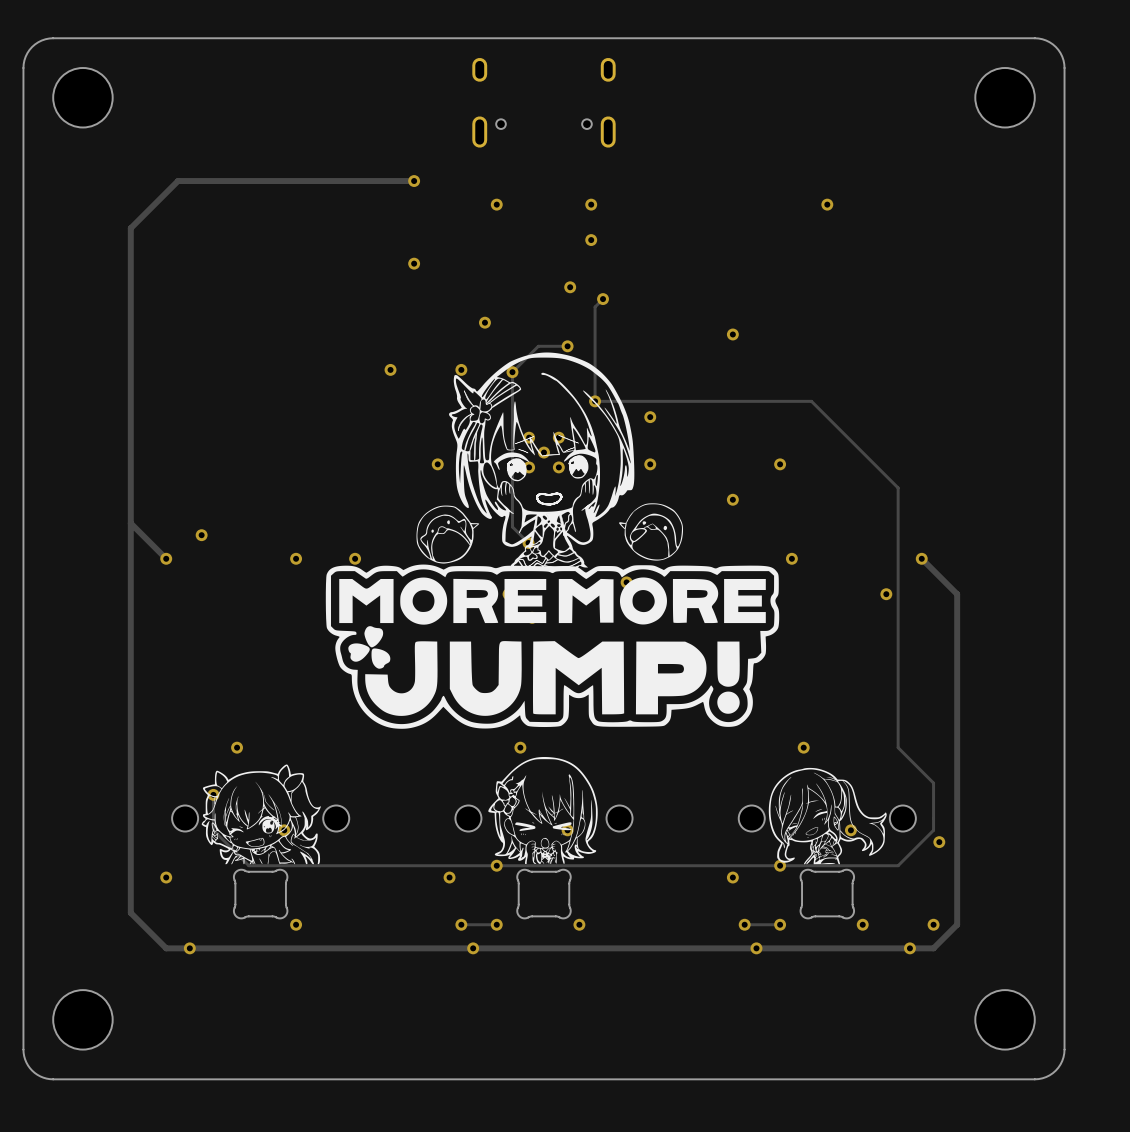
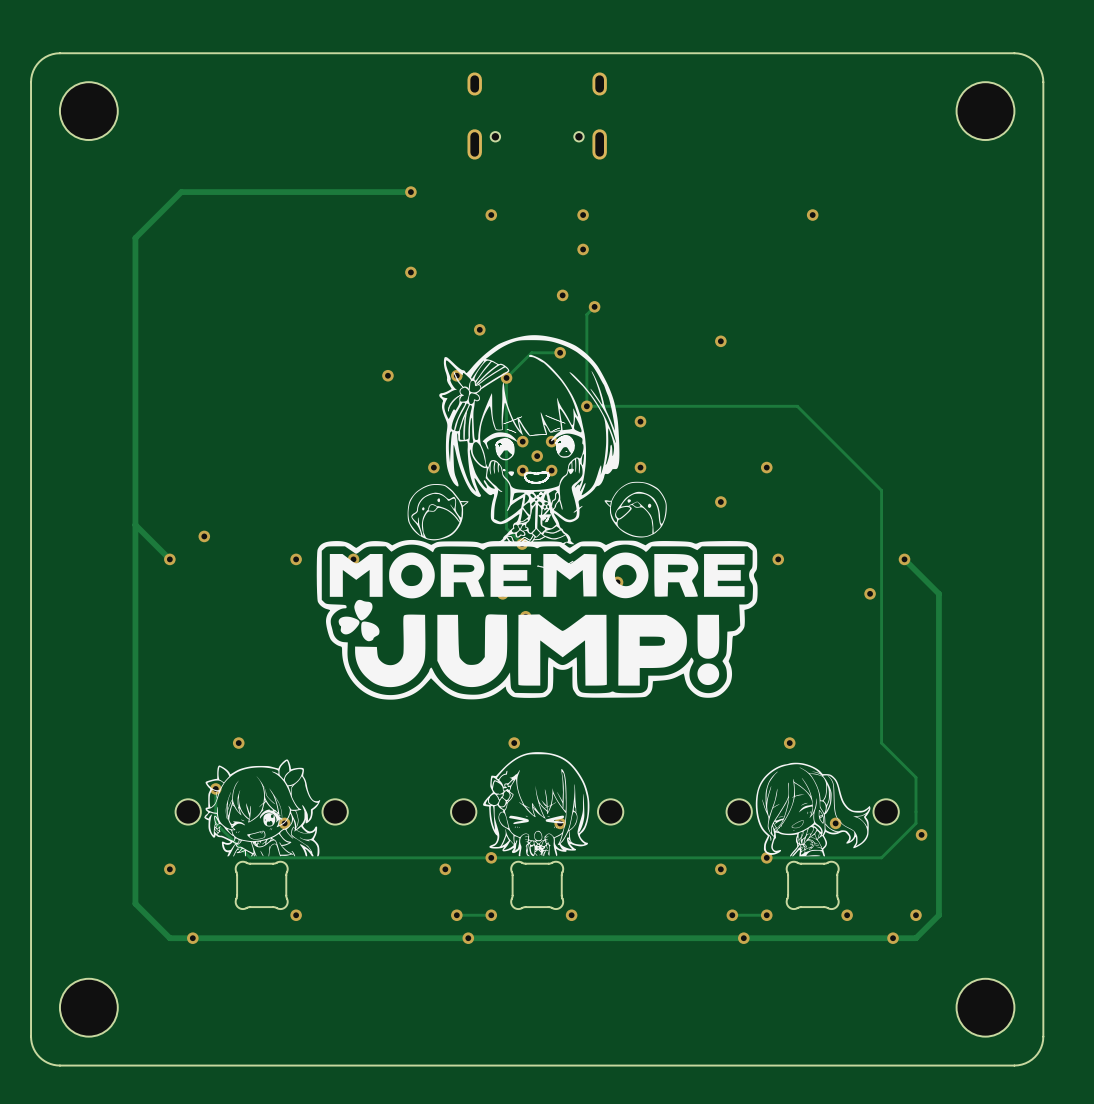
drawing position: (469, 398) -> (458, 379)
drawing position: (464, 422) -> (454, 403)
drawing position: (568, 439) -> (555, 419)
drawing position: (524, 440) -> (512, 420)
drawing position: (475, 446) -> (465, 426)
drawing position: (568, 450) -> (555, 429)
drawing position: (523, 451) -> (511, 431)
drawing position: (551, 455) -> (538, 435)
drawing position: (541, 460) -> (529, 439)
drawing position: (511, 461) -> (500, 440)
line: (523, 464) (523, 464) -> (511, 444) (511, 444)
drawing position: (578, 465) -> (565, 444)
drawing position: (578, 466) -> (565, 446)
drawing position: (516, 467) -> (504, 447)
drawing position: (516, 469) -> (505, 449)
line: (559, 494) (539, 494) -> (546, 472) (527, 473)
line: (537, 498) (537, 500) -> (525, 477) (525, 478)
line: (560, 498) (559, 500) -> (547, 477) (546, 479)
drawing: none -> [535, 502, 538, 530]
line: (540, 502) (548, 504) (556, 502) -> (528, 481) (535, 482) (543, 481)
drawing position: (509, 510) -> (498, 488)
drawing position: (567, 520) -> (554, 498)
drawing position: (448, 522) -> (438, 500)
drawing position: (644, 523) -> (629, 500)
drawing position: (562, 524) -> (549, 502)
drawing position: (574, 526) -> (560, 504)
drawing position: (665, 528) -> (649, 505)
drawing position: (521, 529) -> (509, 507)
drawing position: (432, 531) -> (423, 508)
drawing position: (651, 531) -> (635, 509)
drawing position: (447, 534) -> (438, 512)
drawing position: (565, 554) -> (552, 531)
drawing position: (552, 561) -> (539, 538)
drawing position: (532, 562) -> (520, 539)
drawing position: (475, 600) -> (462, 575)
drawing position: (586, 600) -> (569, 575)
drawing position: (643, 600) -> (625, 575)
drawing position: (366, 601) -> (356, 575)
drawing position: (423, 601) -> (411, 575)
drawing position: (525, 601) -> (510, 575)
drawing position: (695, 601) -> (676, 575)
drawing position: (744, 601) -> (724, 575)
drawing position: (373, 636) -> (363, 610)
drawing position: (552, 646) -> (537, 619)
drawing position: (359, 652) -> (349, 625)
drawing position: (380, 658) -> (370, 631)
drawing position: (728, 664) -> (708, 636)
drawing position: (578, 677) -> (562, 650)
drawing position: (671, 677) -> (652, 650)
drawing position: (401, 678) -> (390, 650)
drawing position: (485, 678) -> (472, 650)
drawing position: (728, 702) -> (708, 674)

